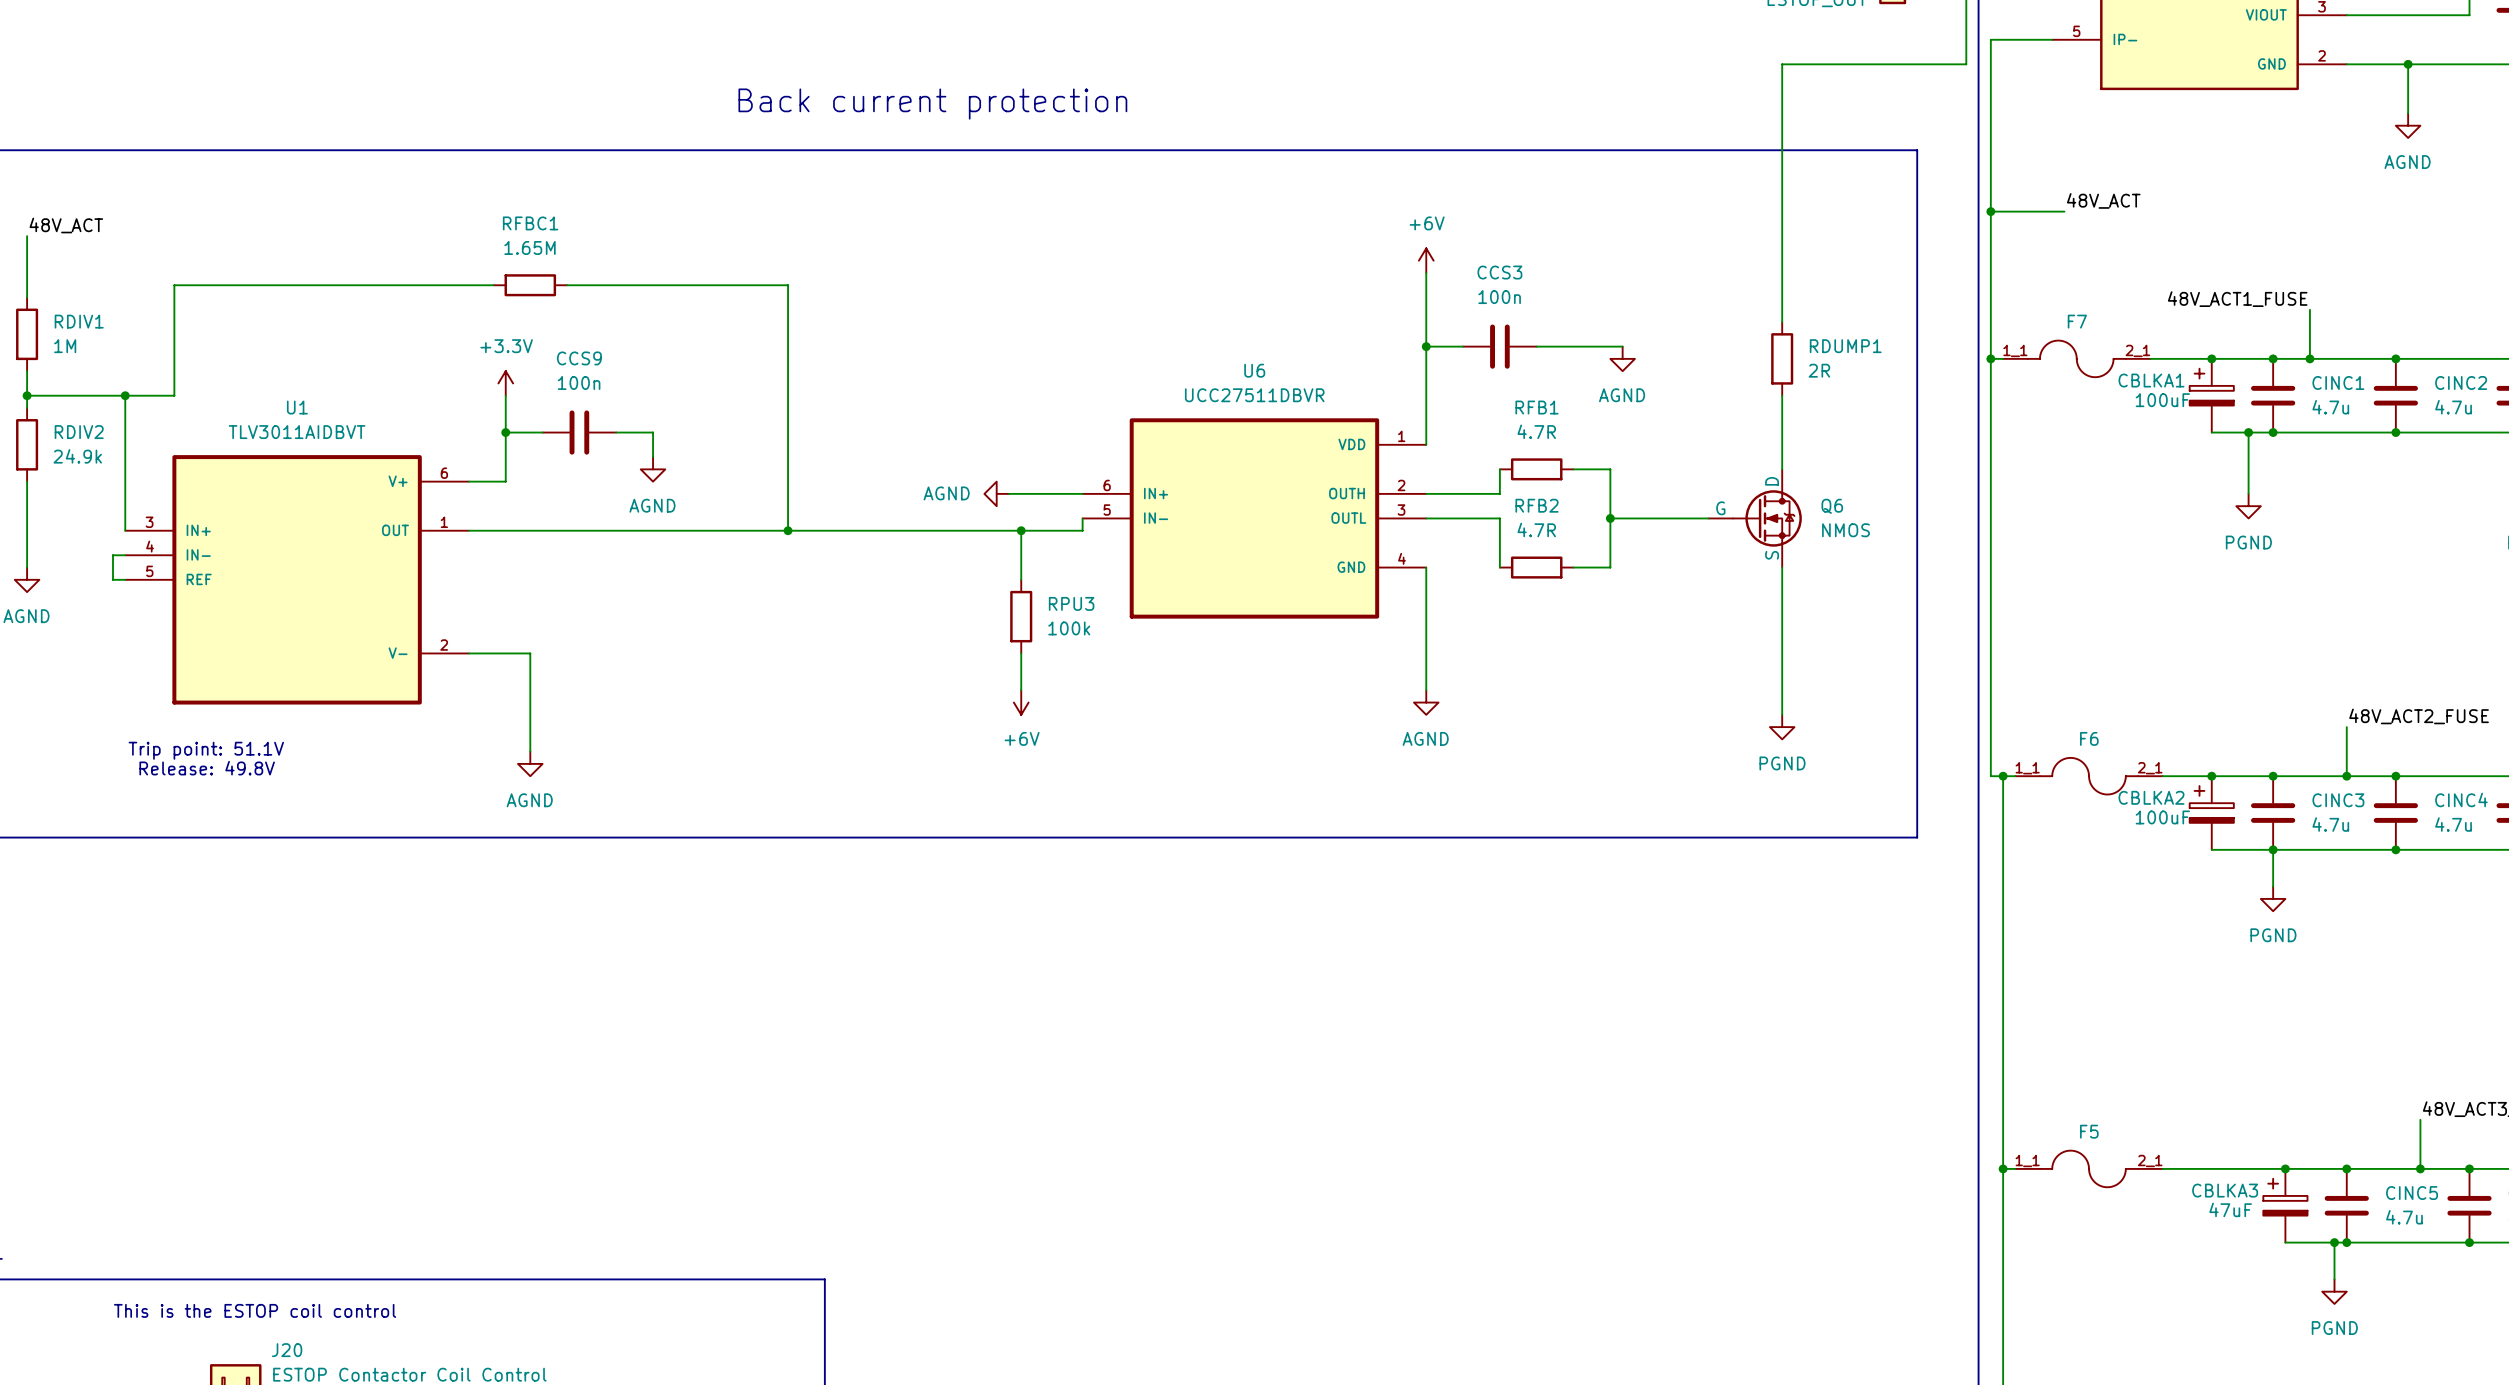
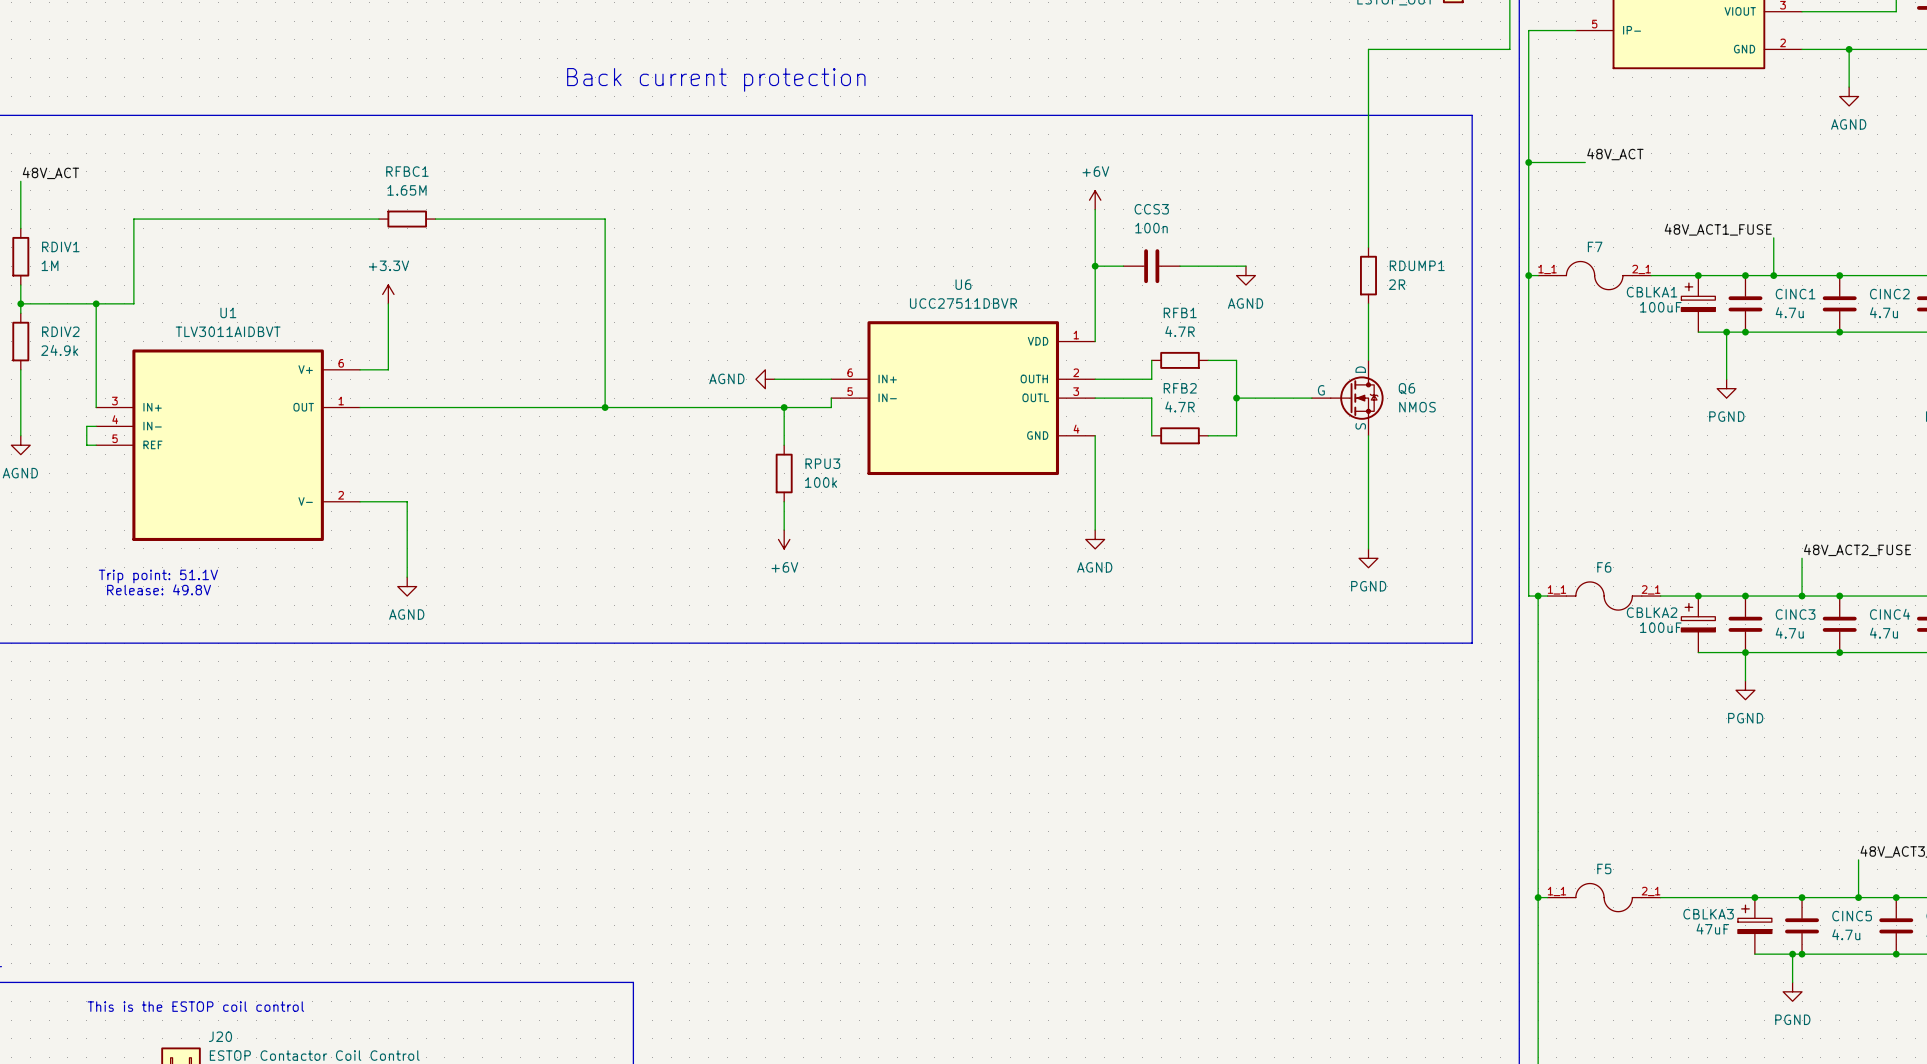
wire: (505, 432) (542, 432) -> none
junction: (505, 432) -> none
CCS9: 100n (579, 432) -> none
wire: (616, 432) (653, 432) (653, 457) -> none
power symbol: AGND (653, 469) -> none

